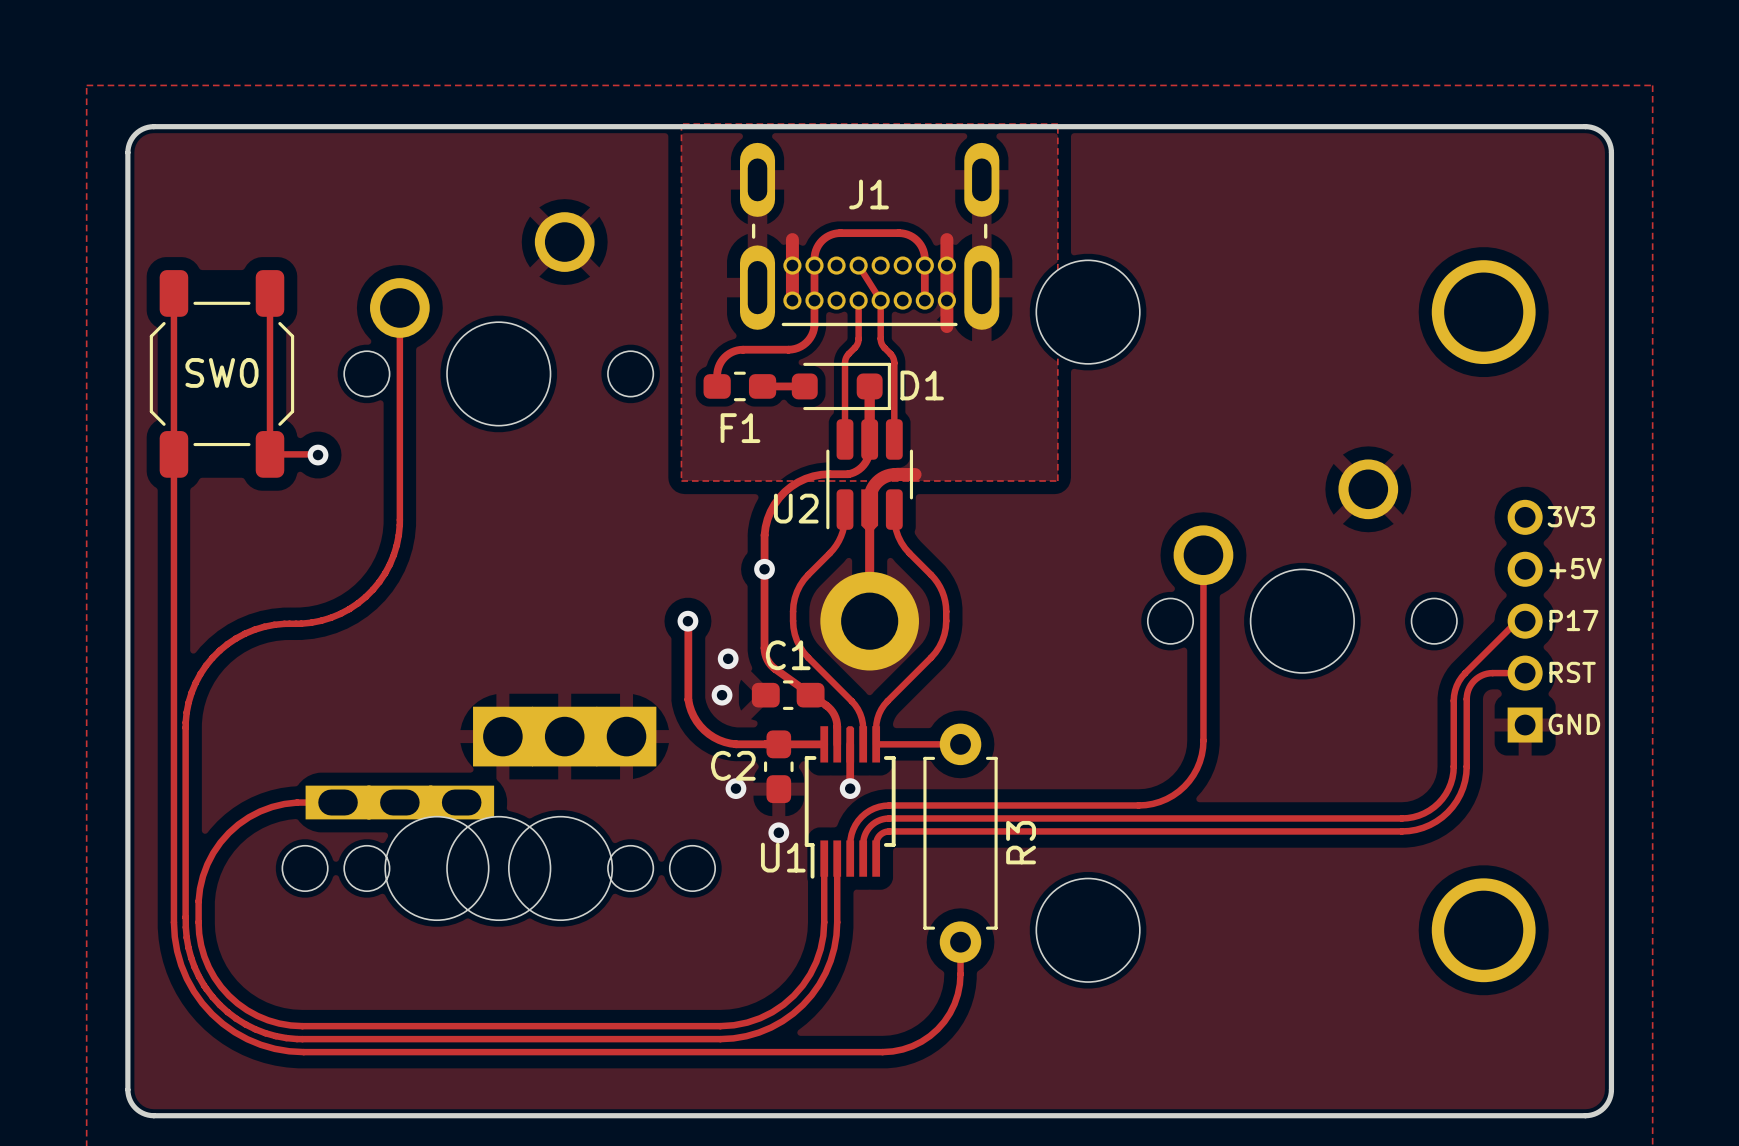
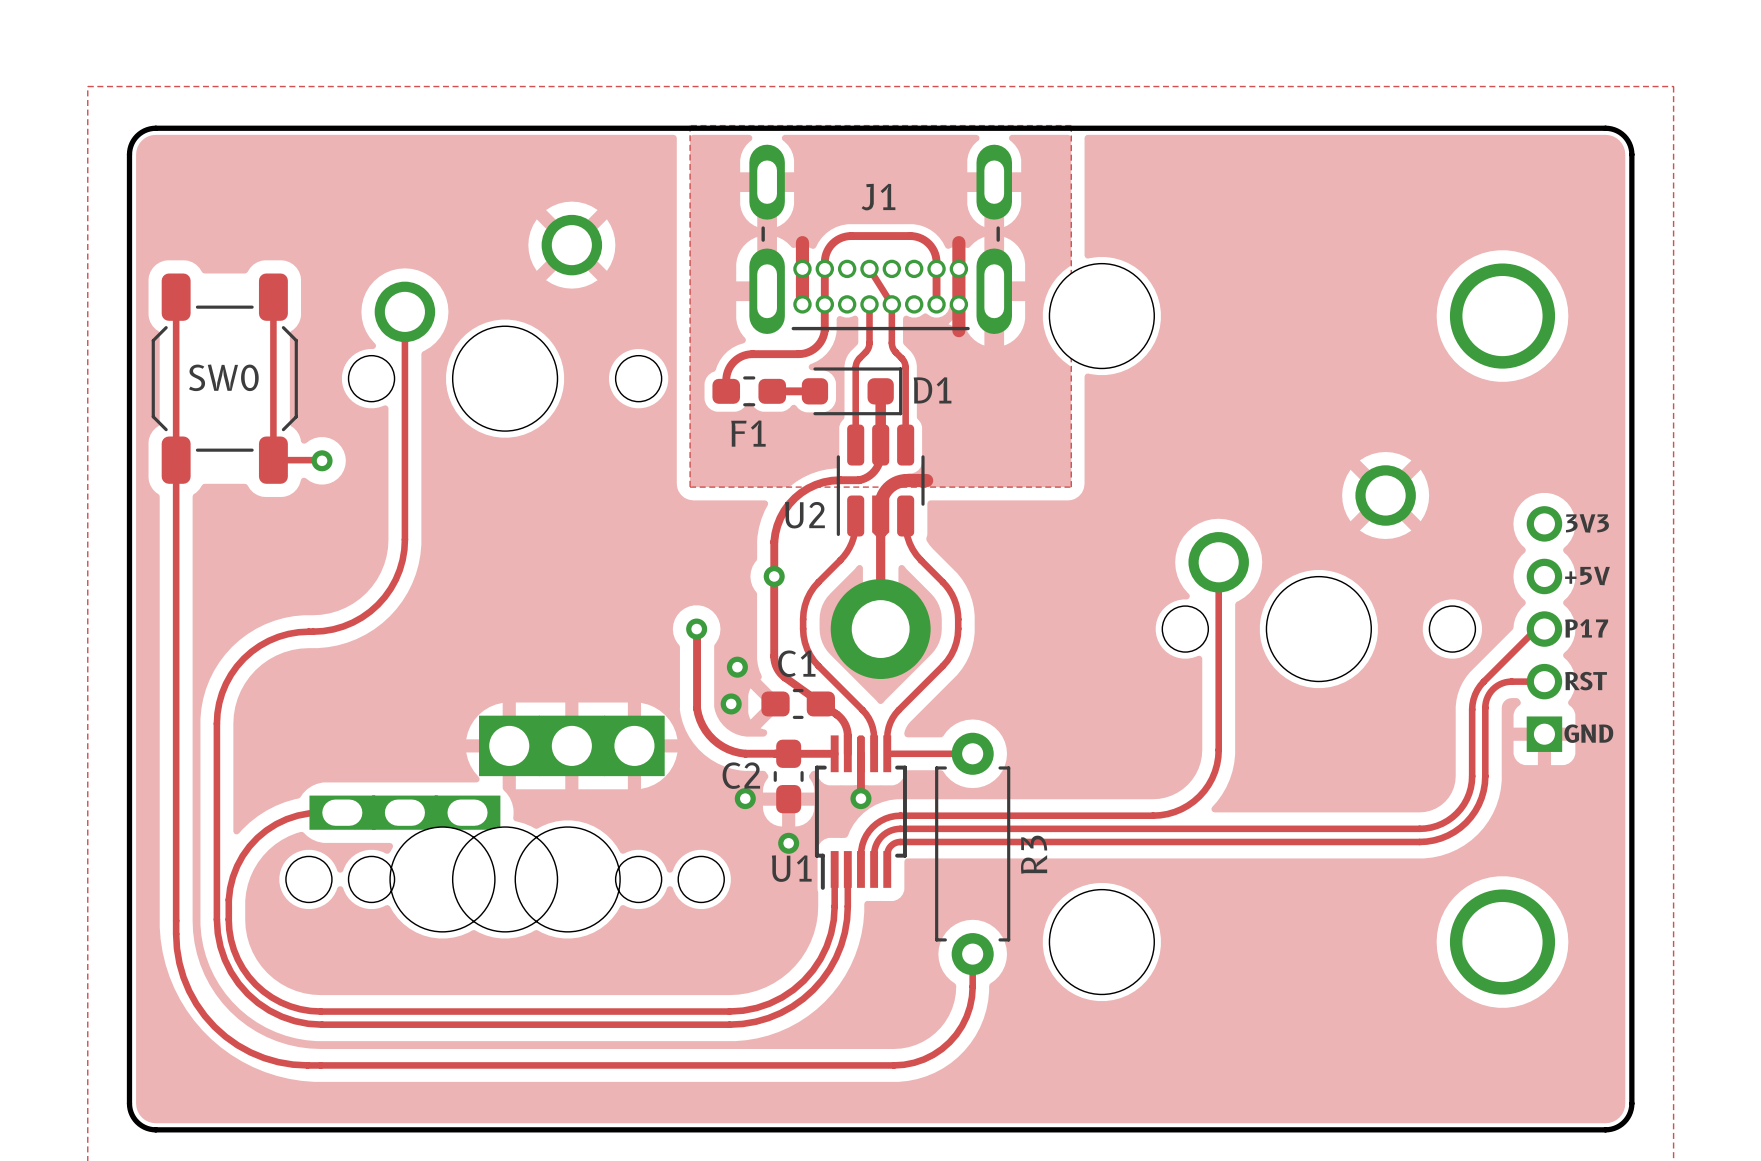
track: (399, 519) (396, 545) (389, 564) (373, 589) (357, 603) (340, 613) (321, 620) (274, 624) (245, 633) (219, 650) (200, 674) (188, 702) (185, 722) (185, 917) -> (404, 526) (404, 549) (399, 570) (390, 588) (377, 604) (361, 617) (343, 626) (323, 631) (288, 633) (259, 645) (236, 666) (222, 693) (216, 723) (216, 919) (220, 946) (230, 972) (247, 993) (269, 1010) (281, 1016) (308, 1023) (729, 1024)
track: (328, 802) (284, 804) (272, 806) (248, 817) (228, 832) (213, 853) (207, 864) (200, 888) (199, 933) (204, 956) (214, 977) (237, 1003) (257, 1015) (279, 1023) (302, 1026) (720, 1026) (747, 1022) (772, 1012) (783, 1004) (802, 985) (810, 974) (816, 962) (823, 935) (824, 895) -> (320, 812) (286, 819) (257, 837) (237, 866) (228, 899) (231, 940) (242, 968) (255, 984) (271, 997) (300, 1009) (320, 1011) (743, 1010) (769, 1003) (782, 997) (793, 989) (812, 970) (820, 958) (831, 933) (834, 906)
track: (837, 895) (834, 948) (825, 973) (811, 995) (793, 1013) (771, 1027) (746, 1036) (720, 1039) (302, 1039) (275, 1036) (245, 1024) (227, 1012) (212, 996) (199, 976) (191, 957) (186, 937) (185, 917) -> (847, 906) (841, 945) (829, 969) (813, 990) (780, 1012) (755, 1021) (729, 1024)

